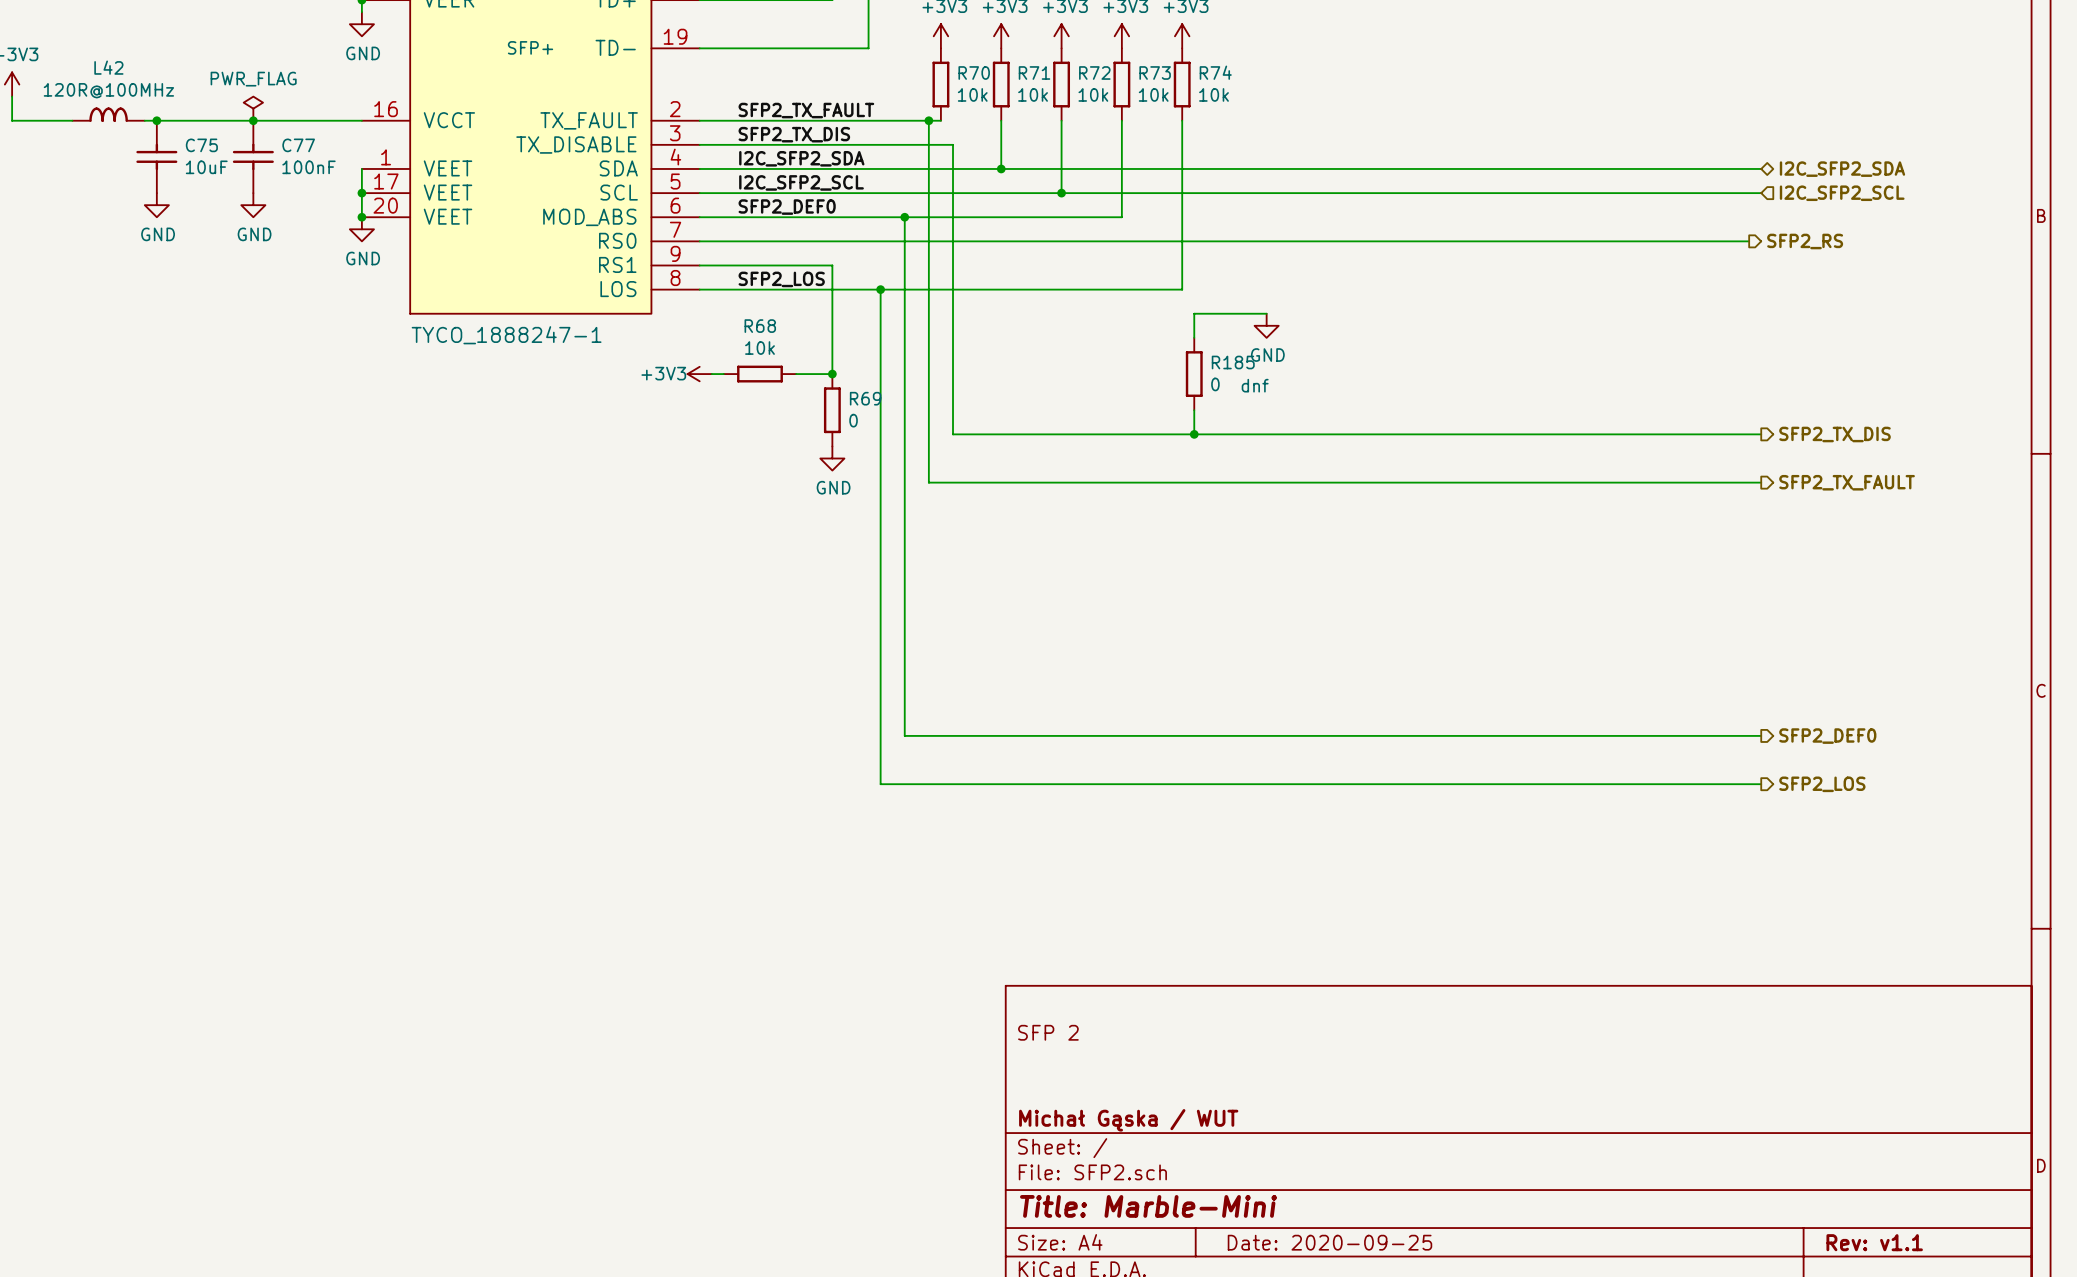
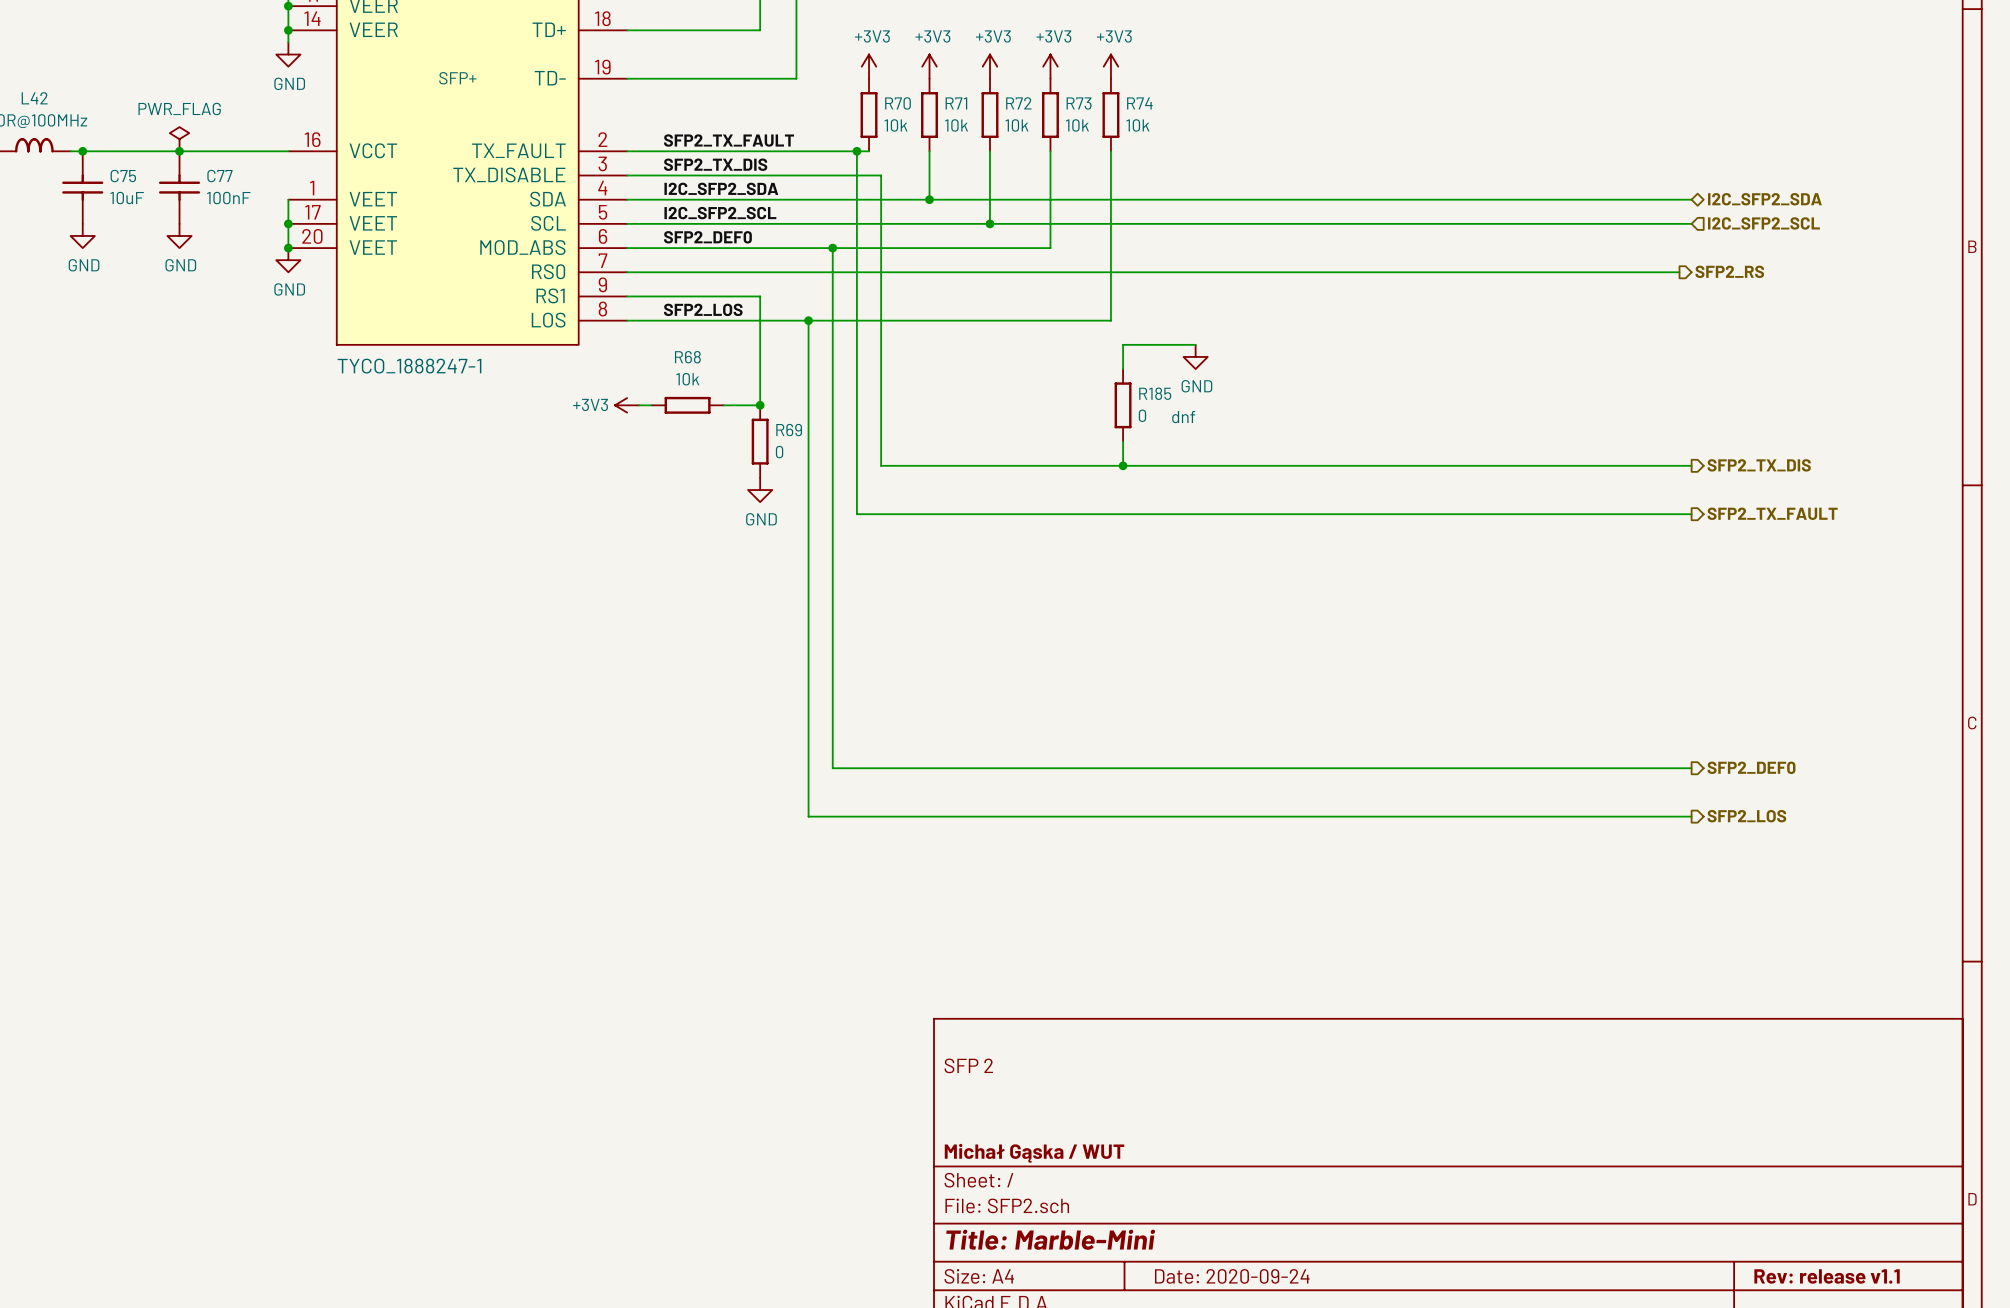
title block: Date: 2020-09-25 (1329, 1242) -> Date: 2020-09-24 (1232, 1276)
title block: Rev: v1.1 (1874, 1242) -> Rev: release v1.1 (1827, 1276)

